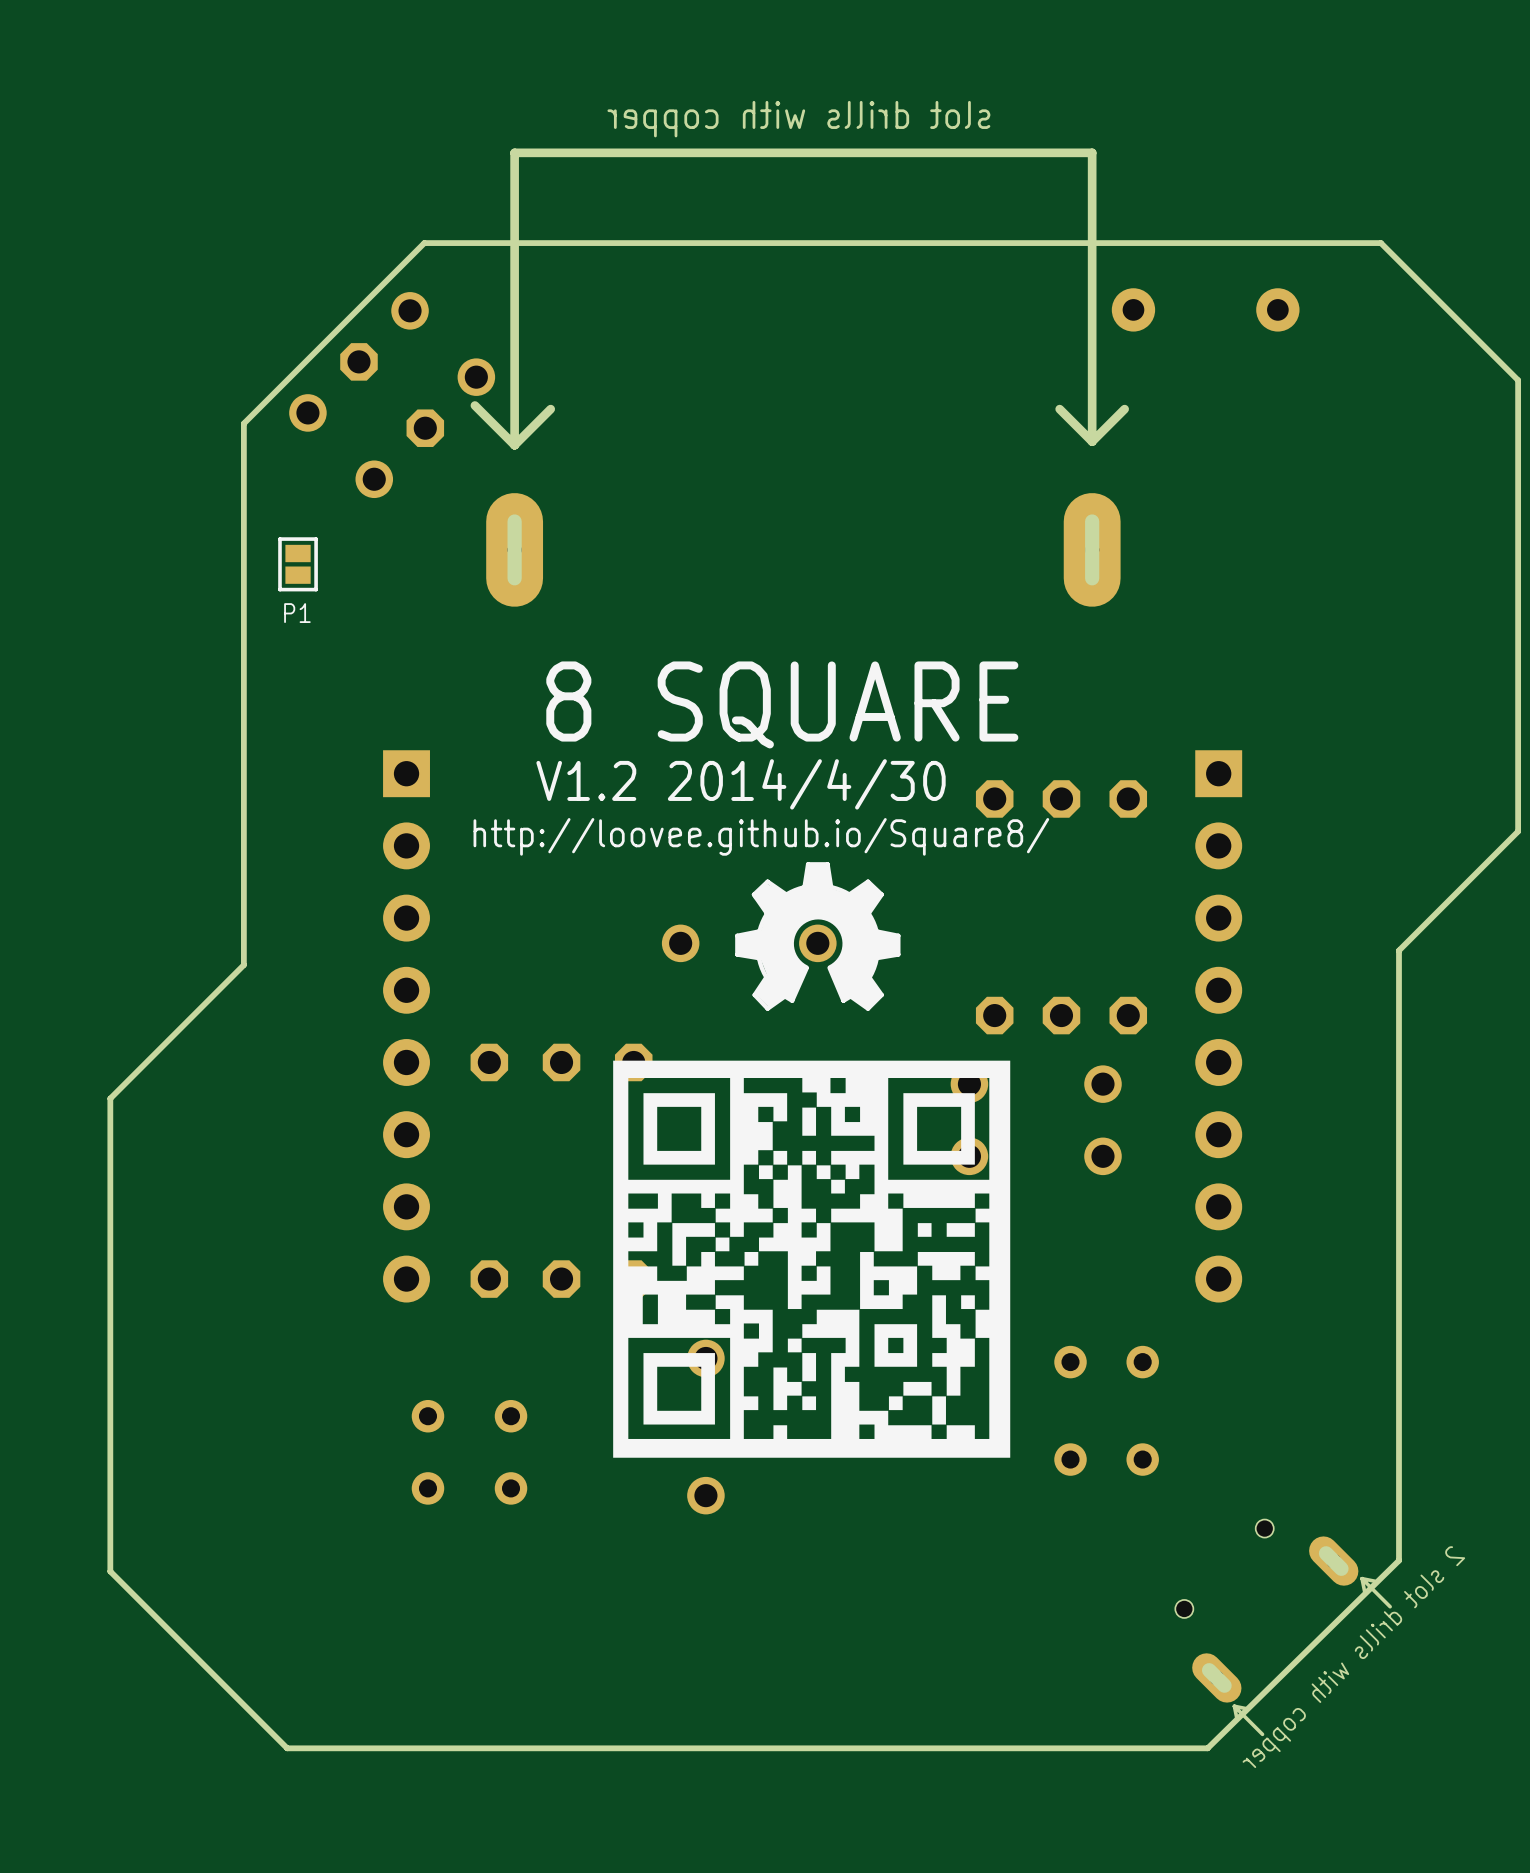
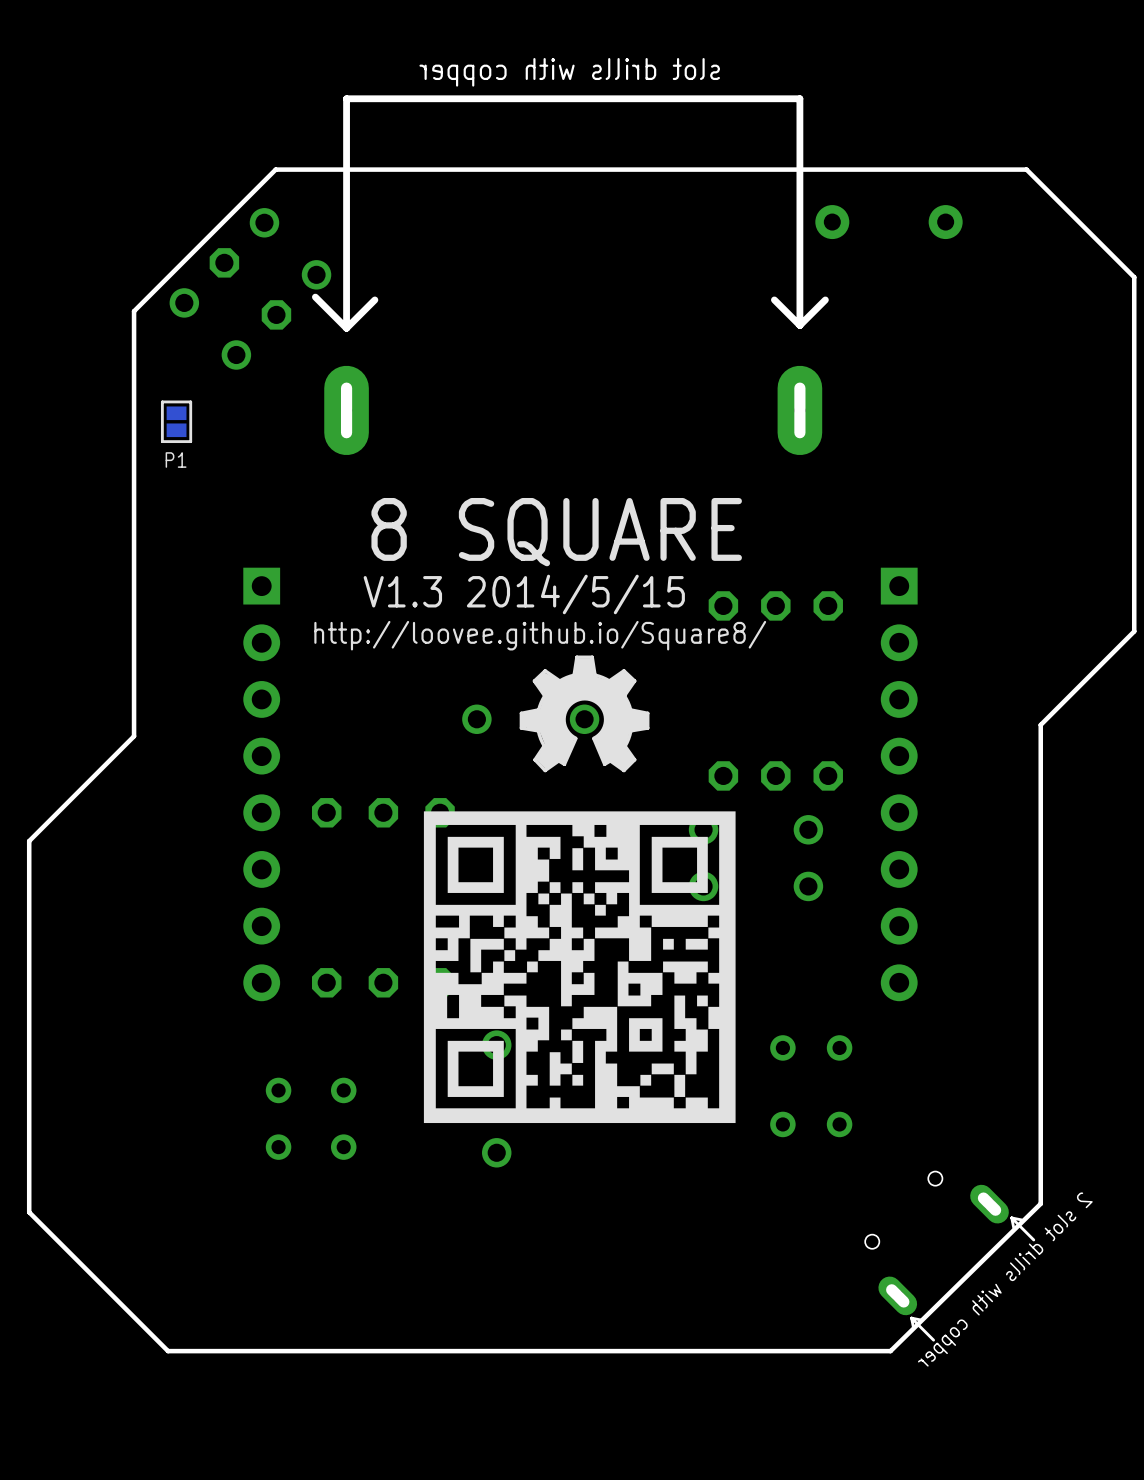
text: V1.2 2014/4/30 (741, 784) -> V1.3 2014/5/15 (524, 594)

